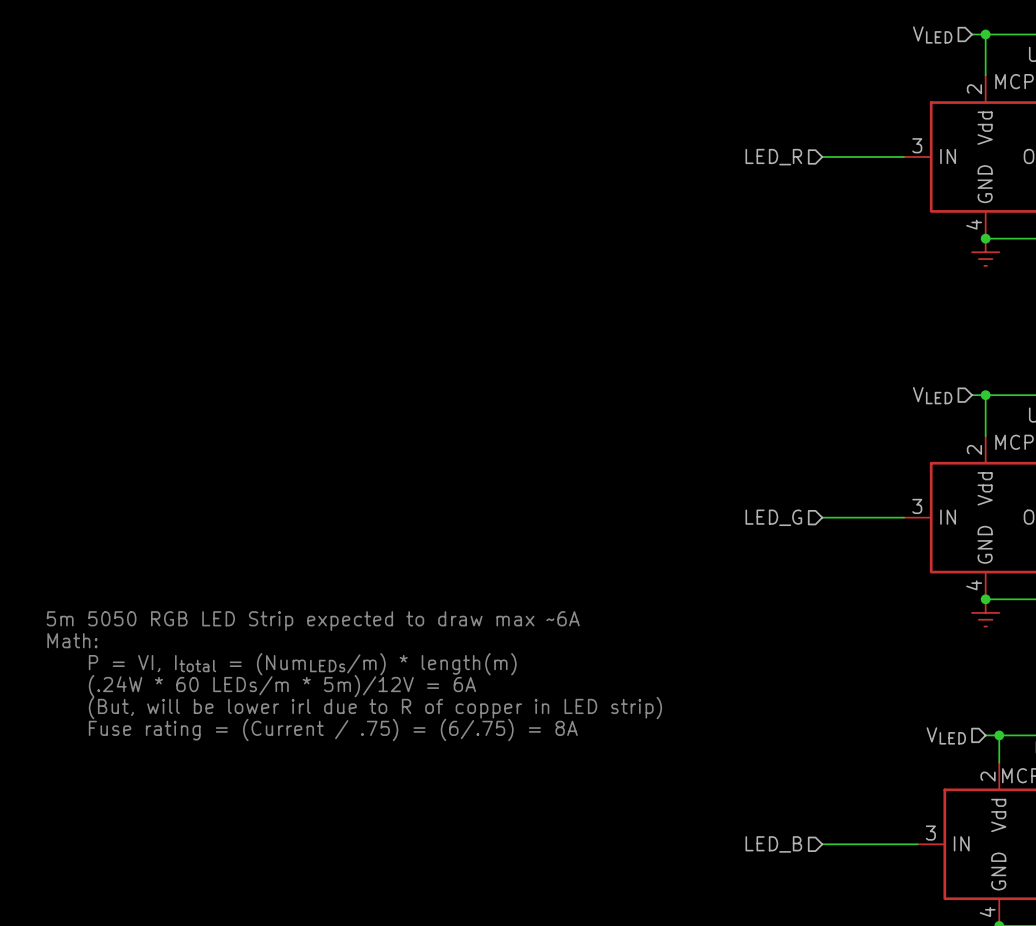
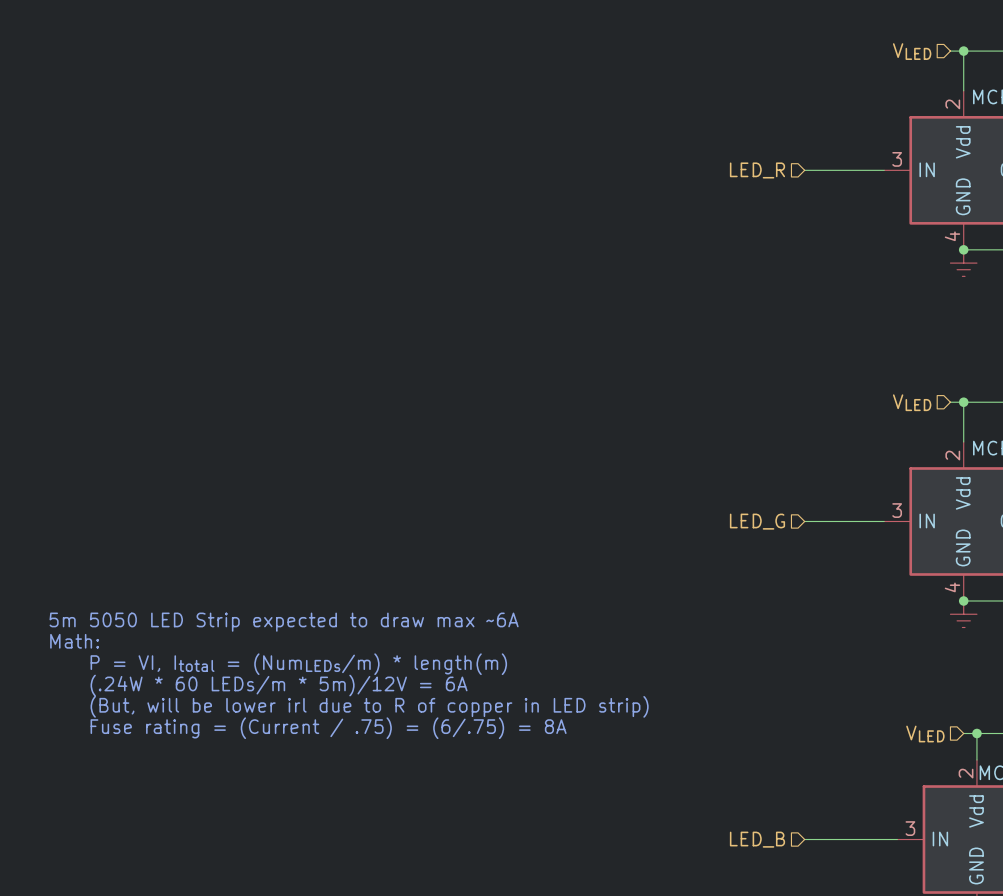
text: 5m 5050 RGB LED Strip expected to draw max ~6A (313, 621) -> 5m 5050 LED Strip expected to draw max ~6A (284, 622)

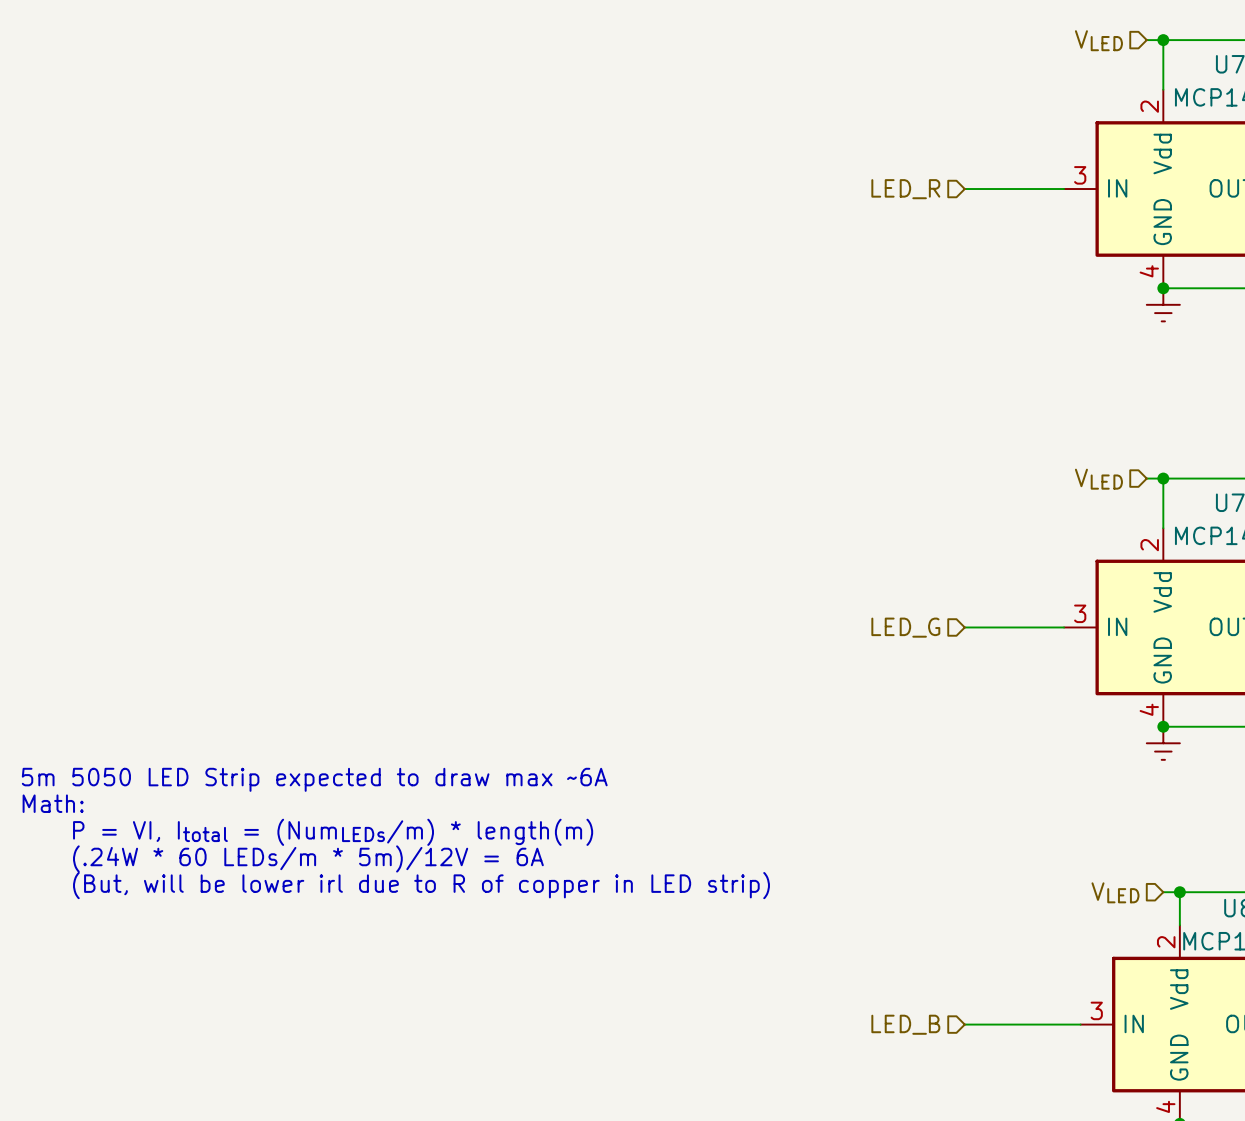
text: 5m 5050 LED Strip expected to draw max ~6A (284, 622) -> none
text: Math: (74, 641) -> 5m 5050 LED Strip expected to draw max ~6A (314, 779)
text: P = VI, Itotal = (NumLEDs/m) * length(m) (298, 664) -> Math: (53, 803)
text: (.24W * 60 LEDs/m * 5m)/12V = 6A (279, 685) -> P = VI, Itotal = (NumLEDs/m) * length(m) (333, 832)
text: (But, will be lower irl due to R of copper in LED strip) (369, 706) -> (.24W * 60 LEDs/m * 5m)/12V = 6A (308, 858)
text: Fuse rating = (Current / .75) = (6/.75) = 8A (328, 728) -> (But, will be lower irl due to R of copper in LED strip) (421, 885)

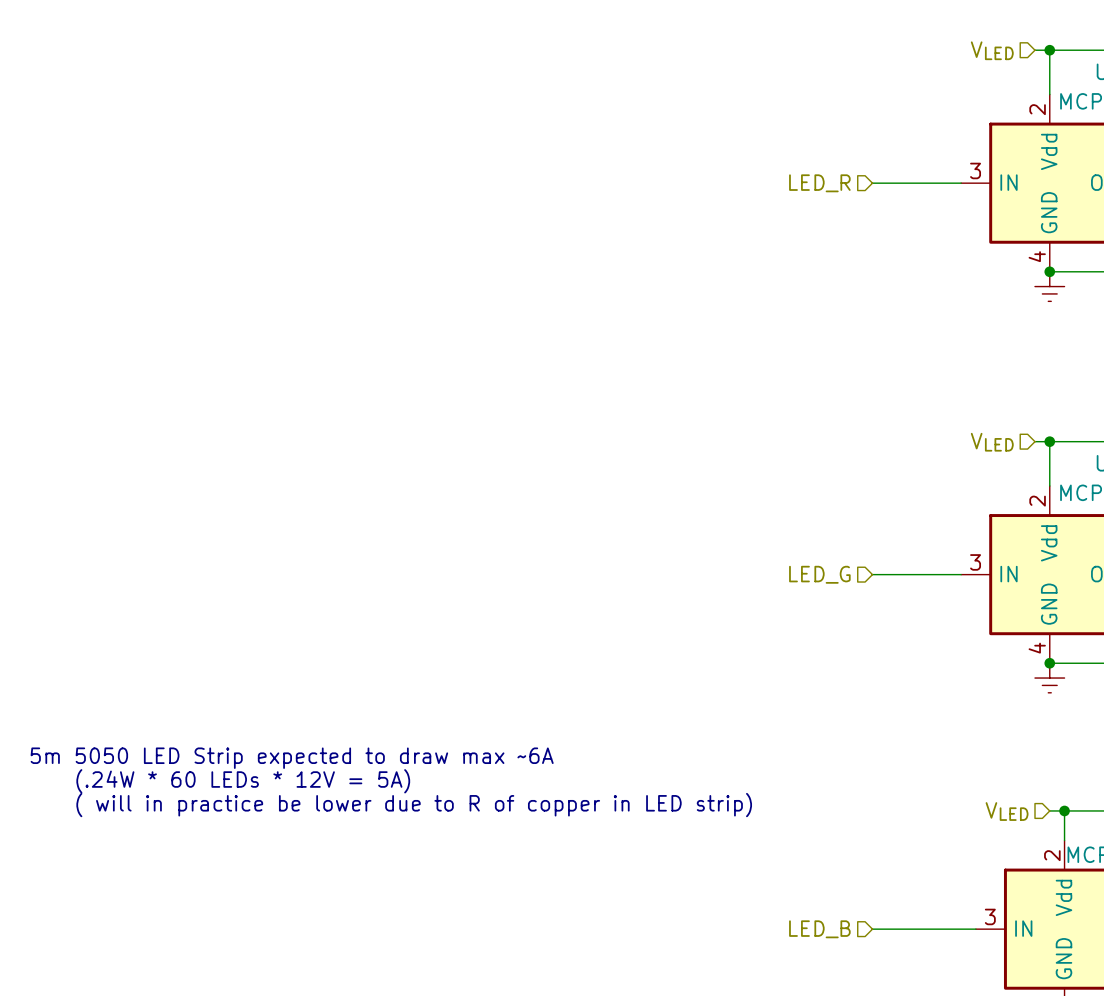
text: 5m 5050 LED Strip expected to draw max ~6A (314, 779) -> none
text: Math: (53, 803) -> none
text: P = VI, Itotal = (NumLEDs/m) * length(m) (333, 832) -> 5m 5050 LED Strip expected to draw max ~6A (292, 758)
text: (.24W * 60 LEDs/m * 5m)/12V = 6A (308, 858) -> (.24W * 60 LEDs * 12V = 5A) (243, 781)
text: (But, will be lower irl due to R of copper in LED strip) (421, 885) -> ( will in practice be lower due to R of copper in LED strip) (414, 805)

